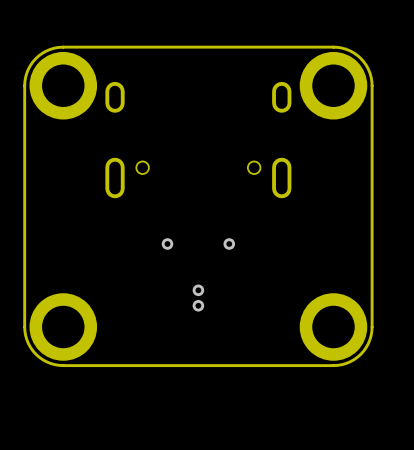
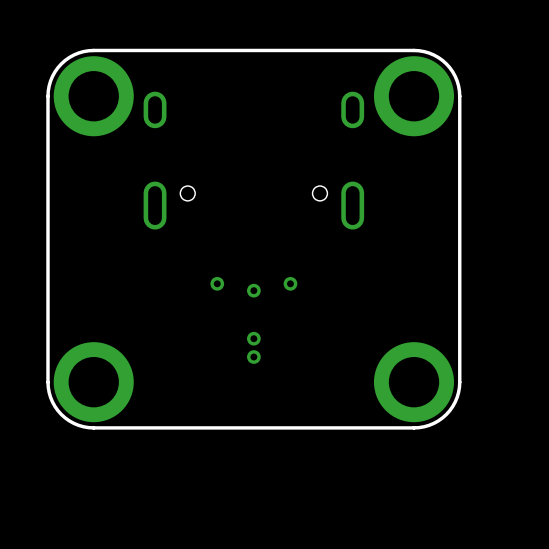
via: none -> (253, 290)

